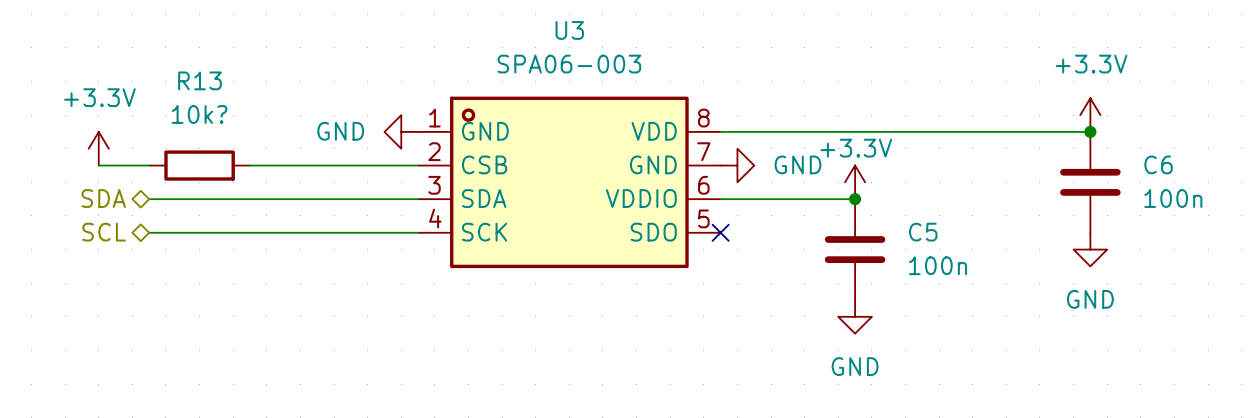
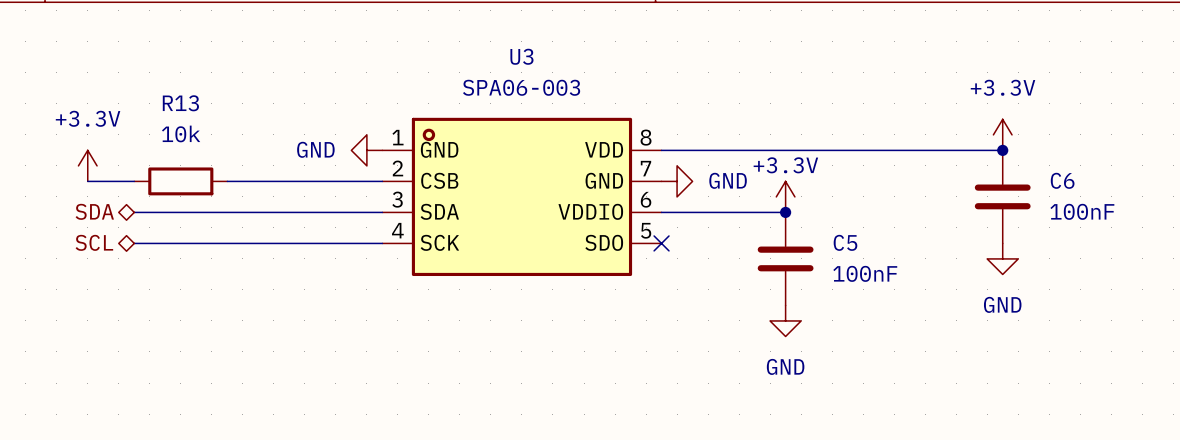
R13 value: 10k? (199, 114) -> 10k (181, 133)
C6 value: 100n (1173, 198) -> 100nF (1082, 211)
C5 value: 100n (938, 265) -> 100nF (865, 273)

